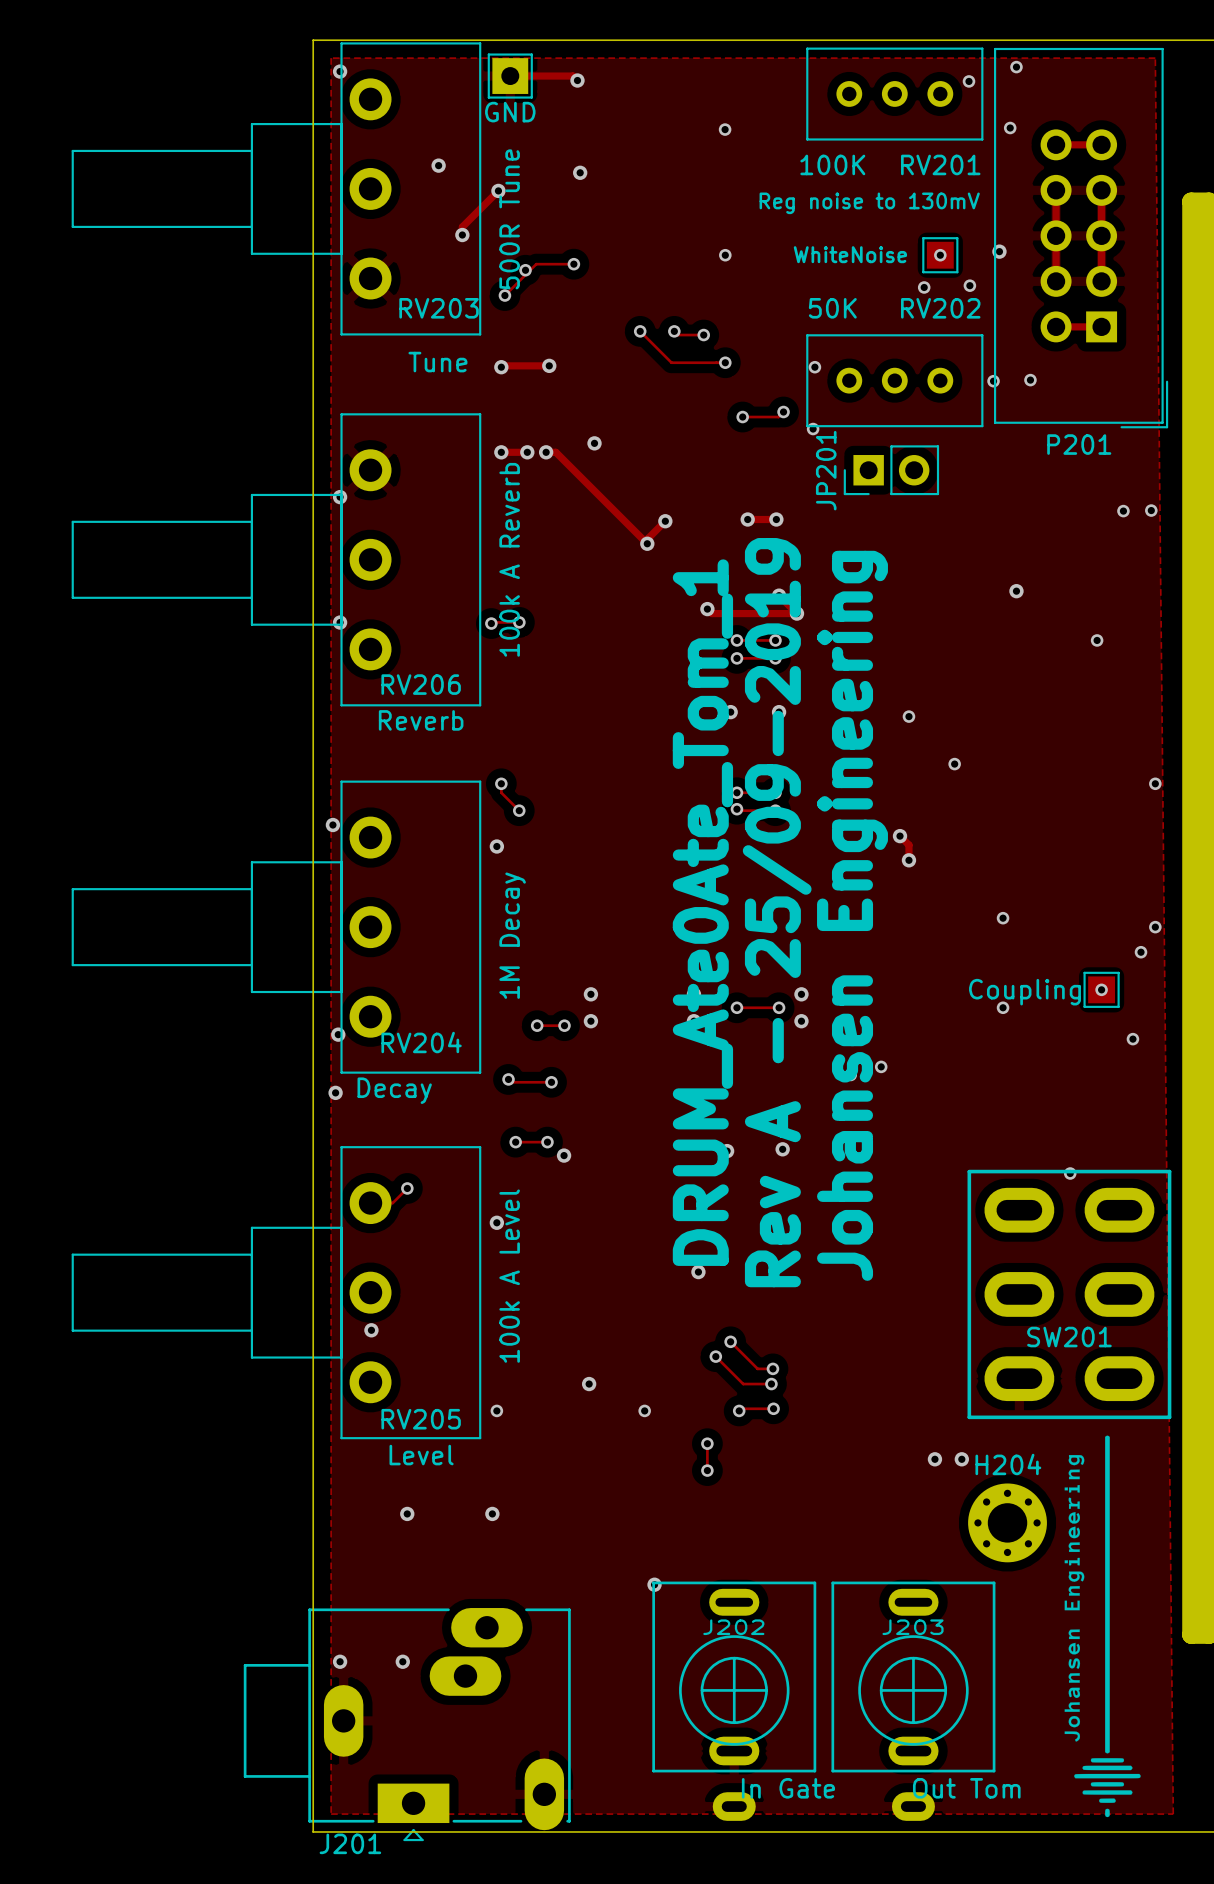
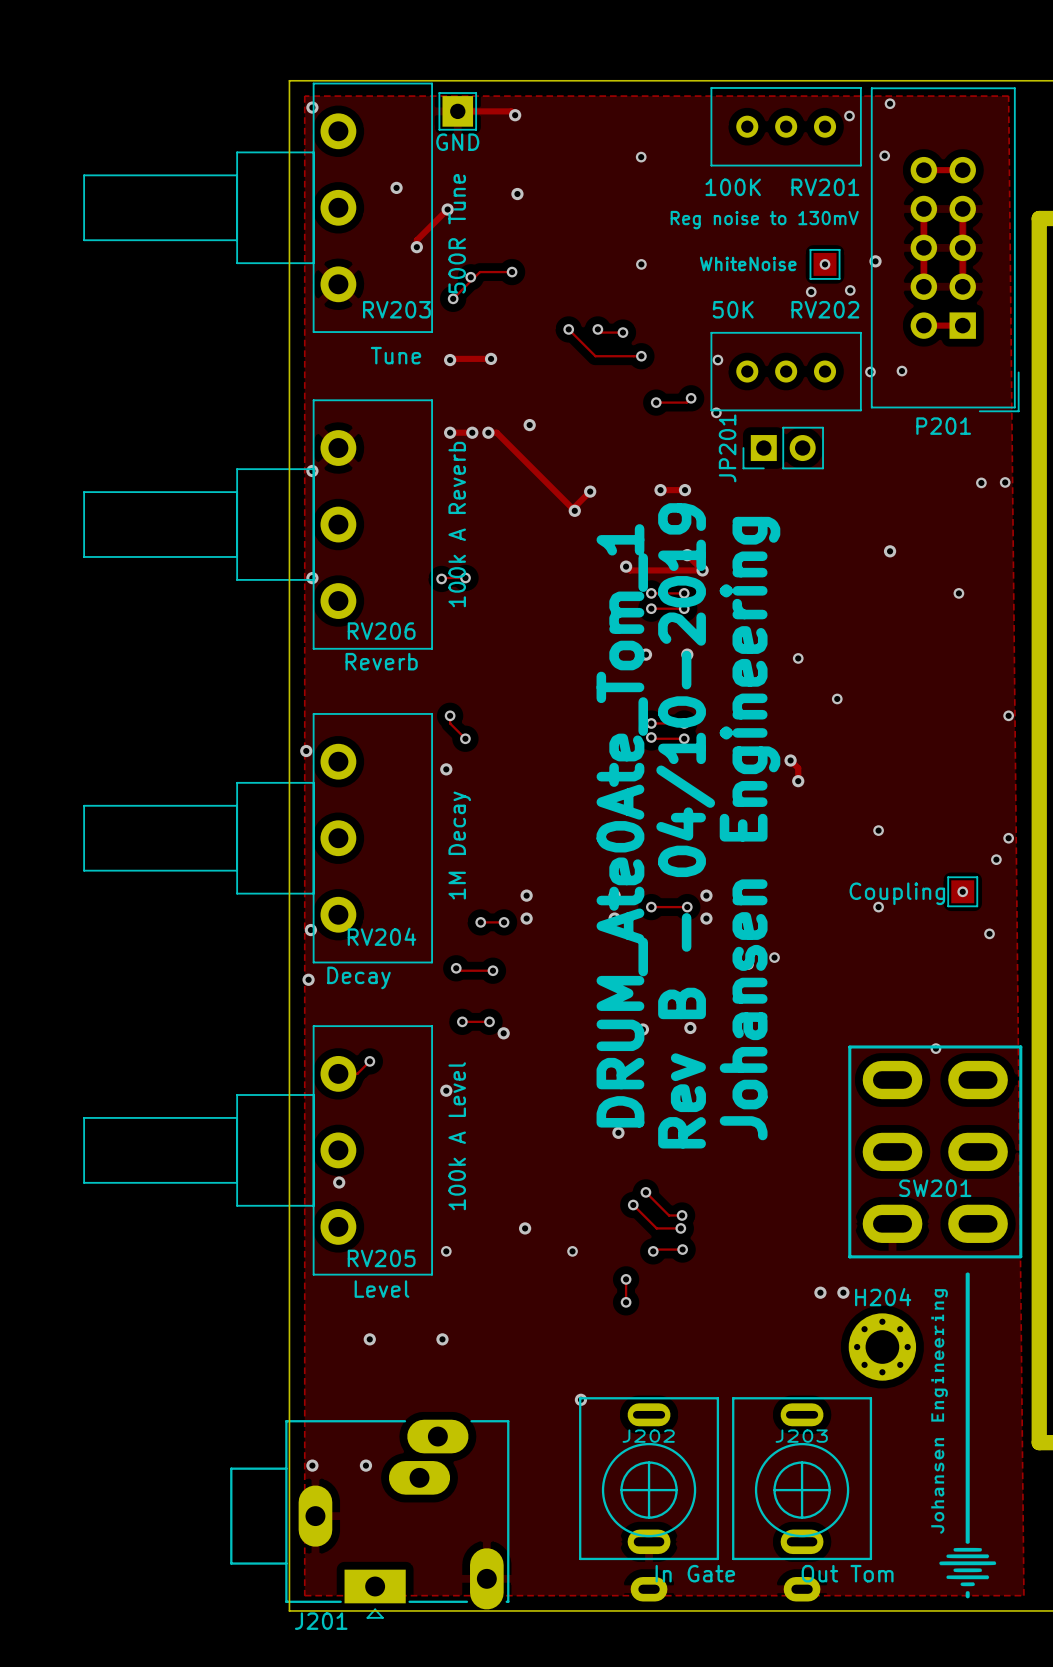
text: Rev A - 25/09-2019 (777, 912) -> Rev B - 04/10-2019 (685, 825)

